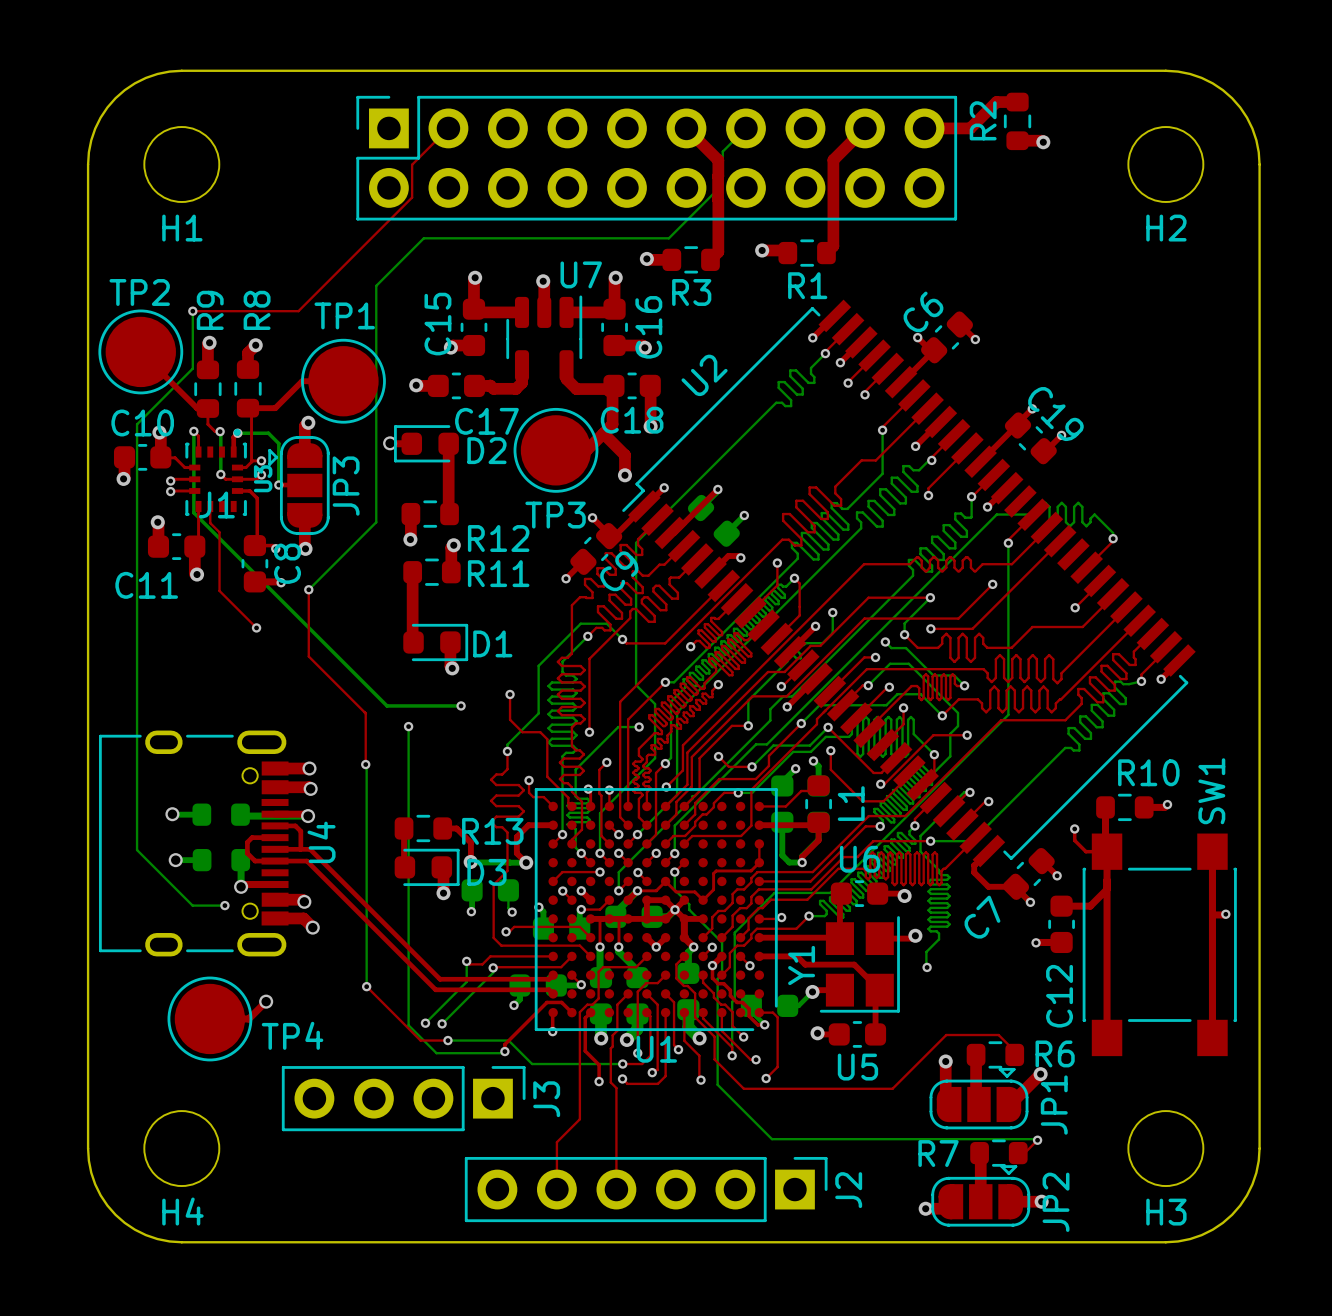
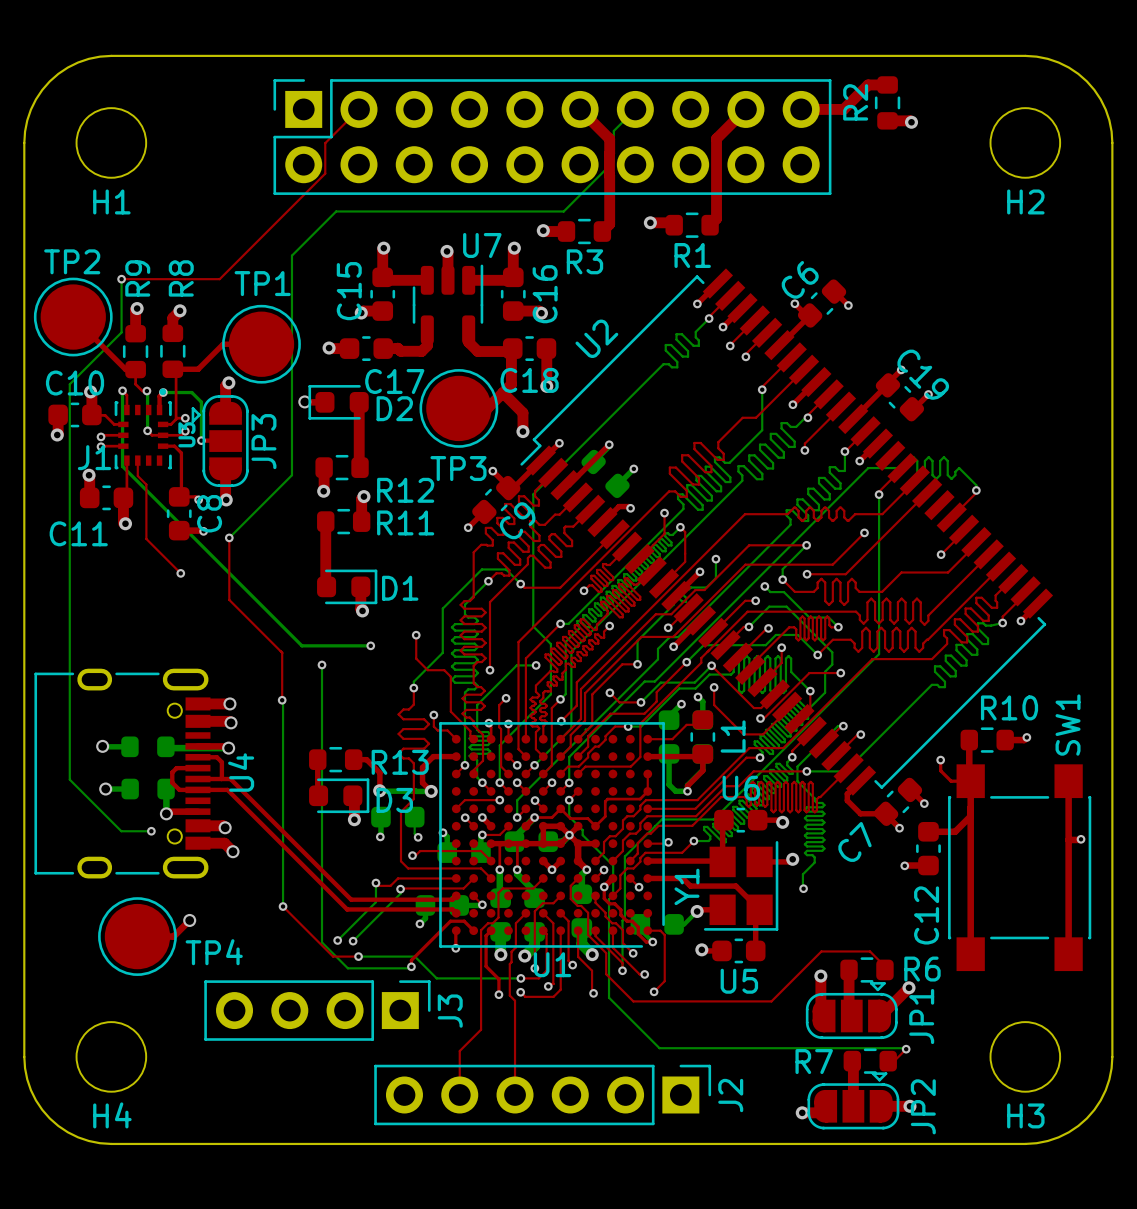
J1 name position: J1 (216, 504) -> J1 (94, 457)

